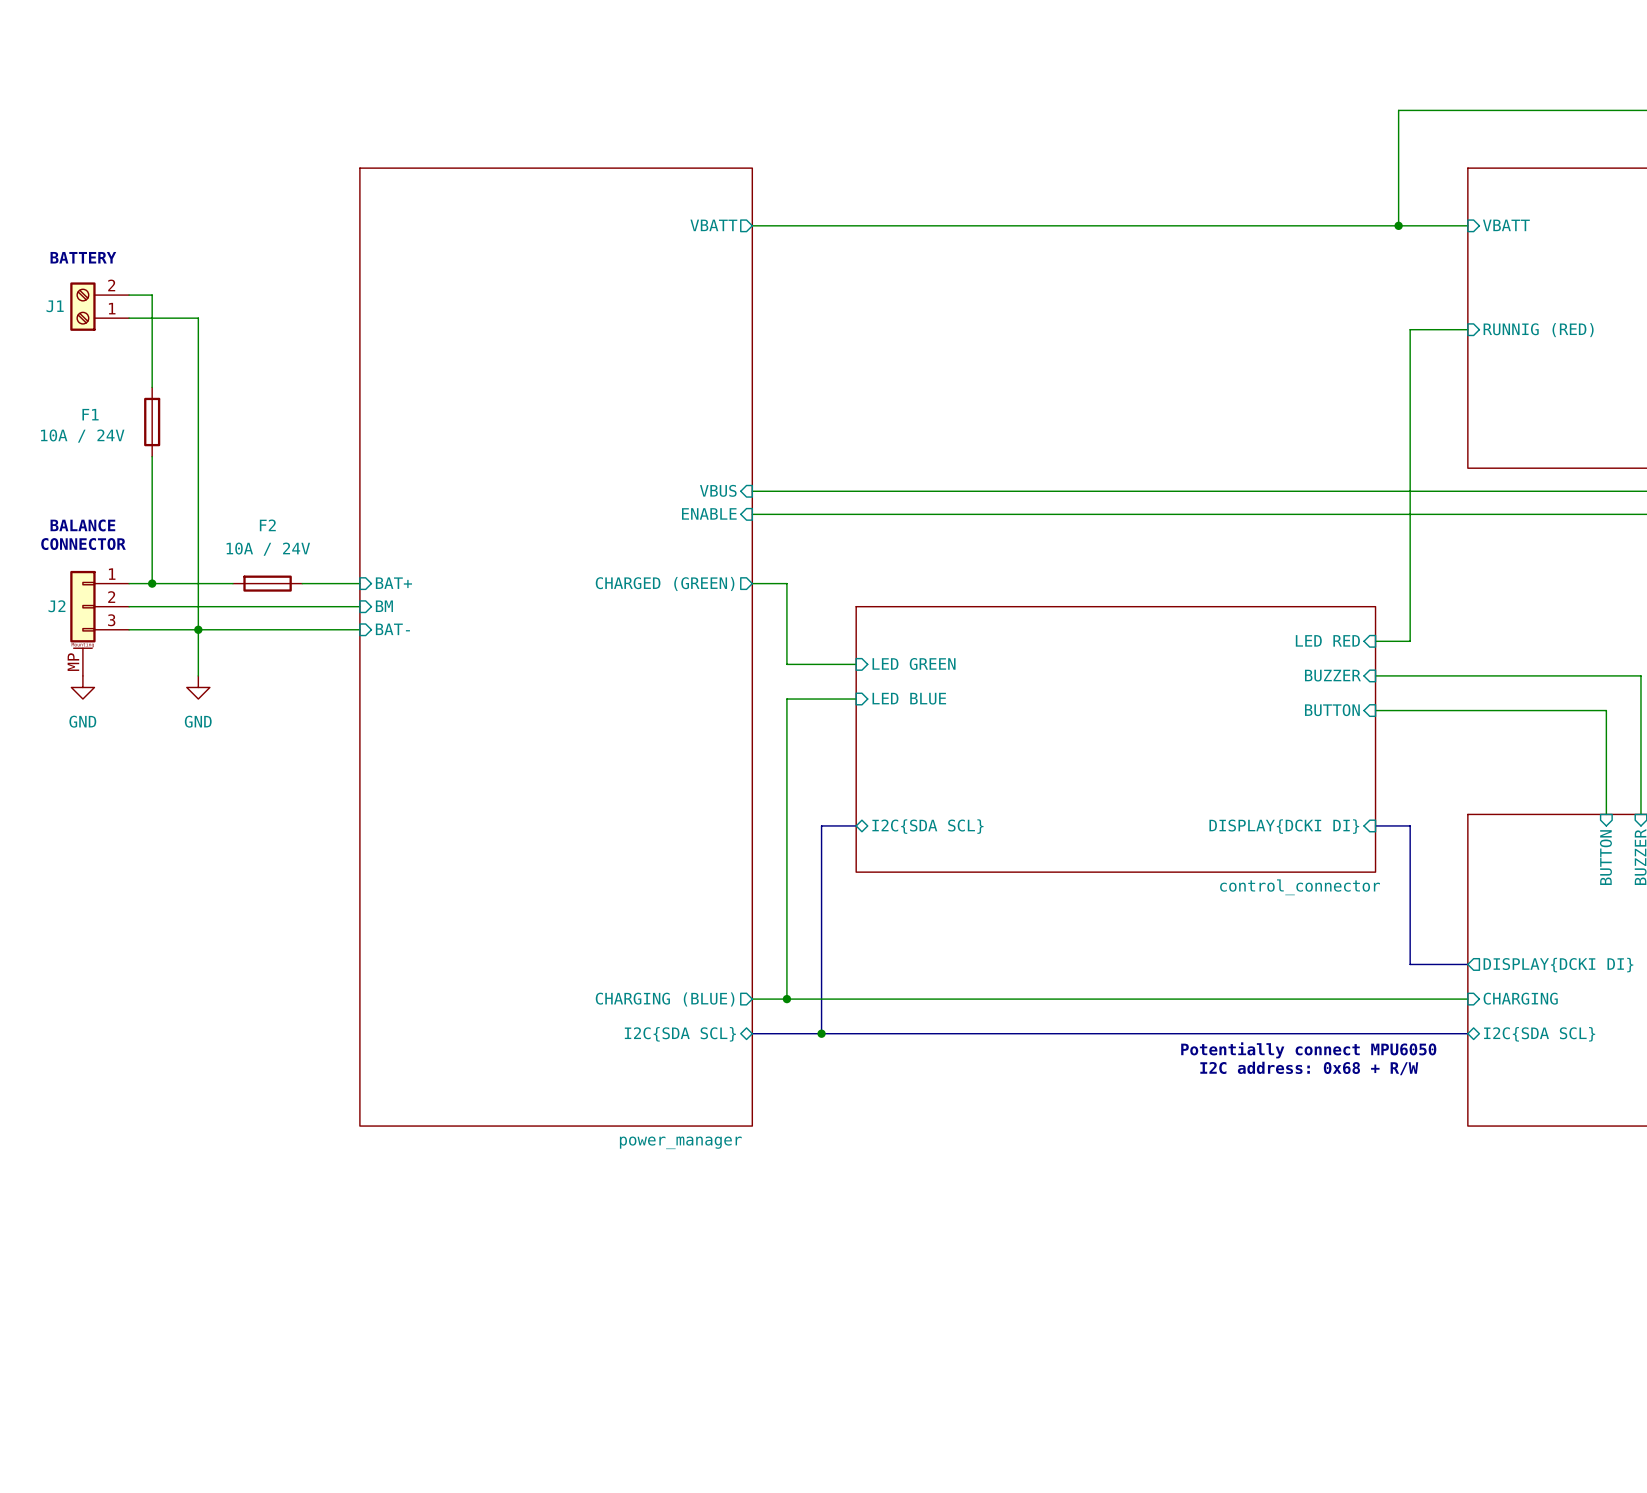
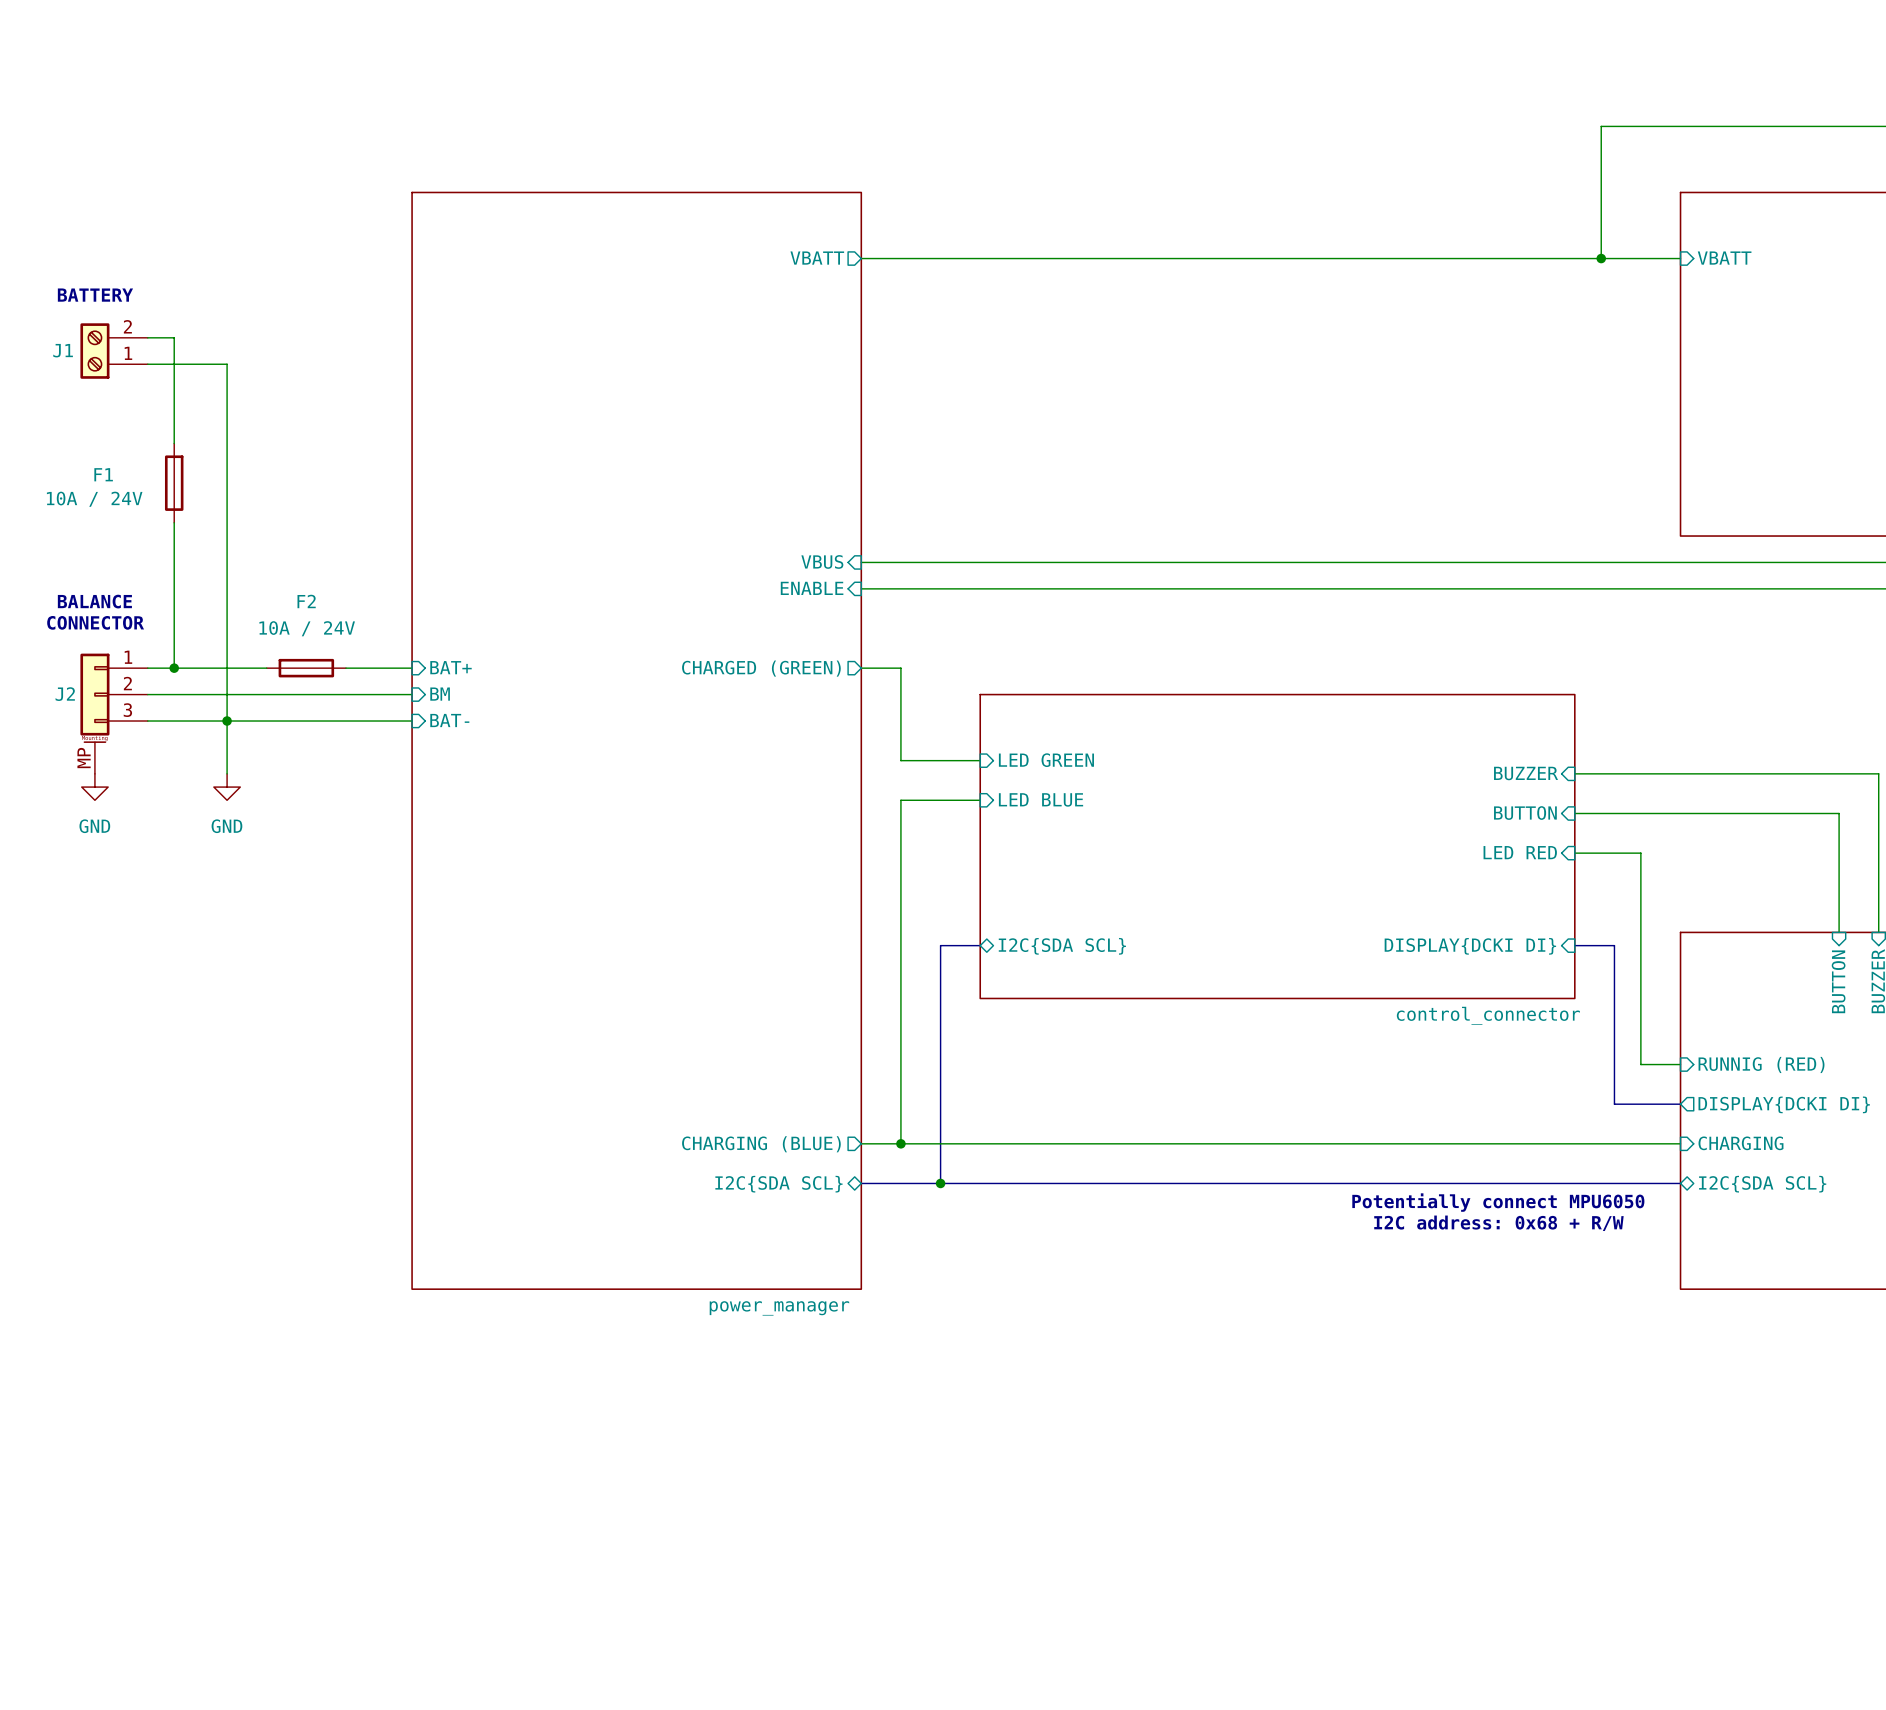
wire: (1467, 329) (1410, 329) (1410, 641) (1375, 641) -> none
sheet pin: RUNNIG (RED) (1538, 330) -> none
sheet pin position: LED RED (1327, 640) -> LED RED (1520, 852)
wire: none -> (1574, 853) (1640, 853) (1640, 1064) (1680, 1064)
sheet pin: none -> RUNNIG (RED) (1761, 1064)

